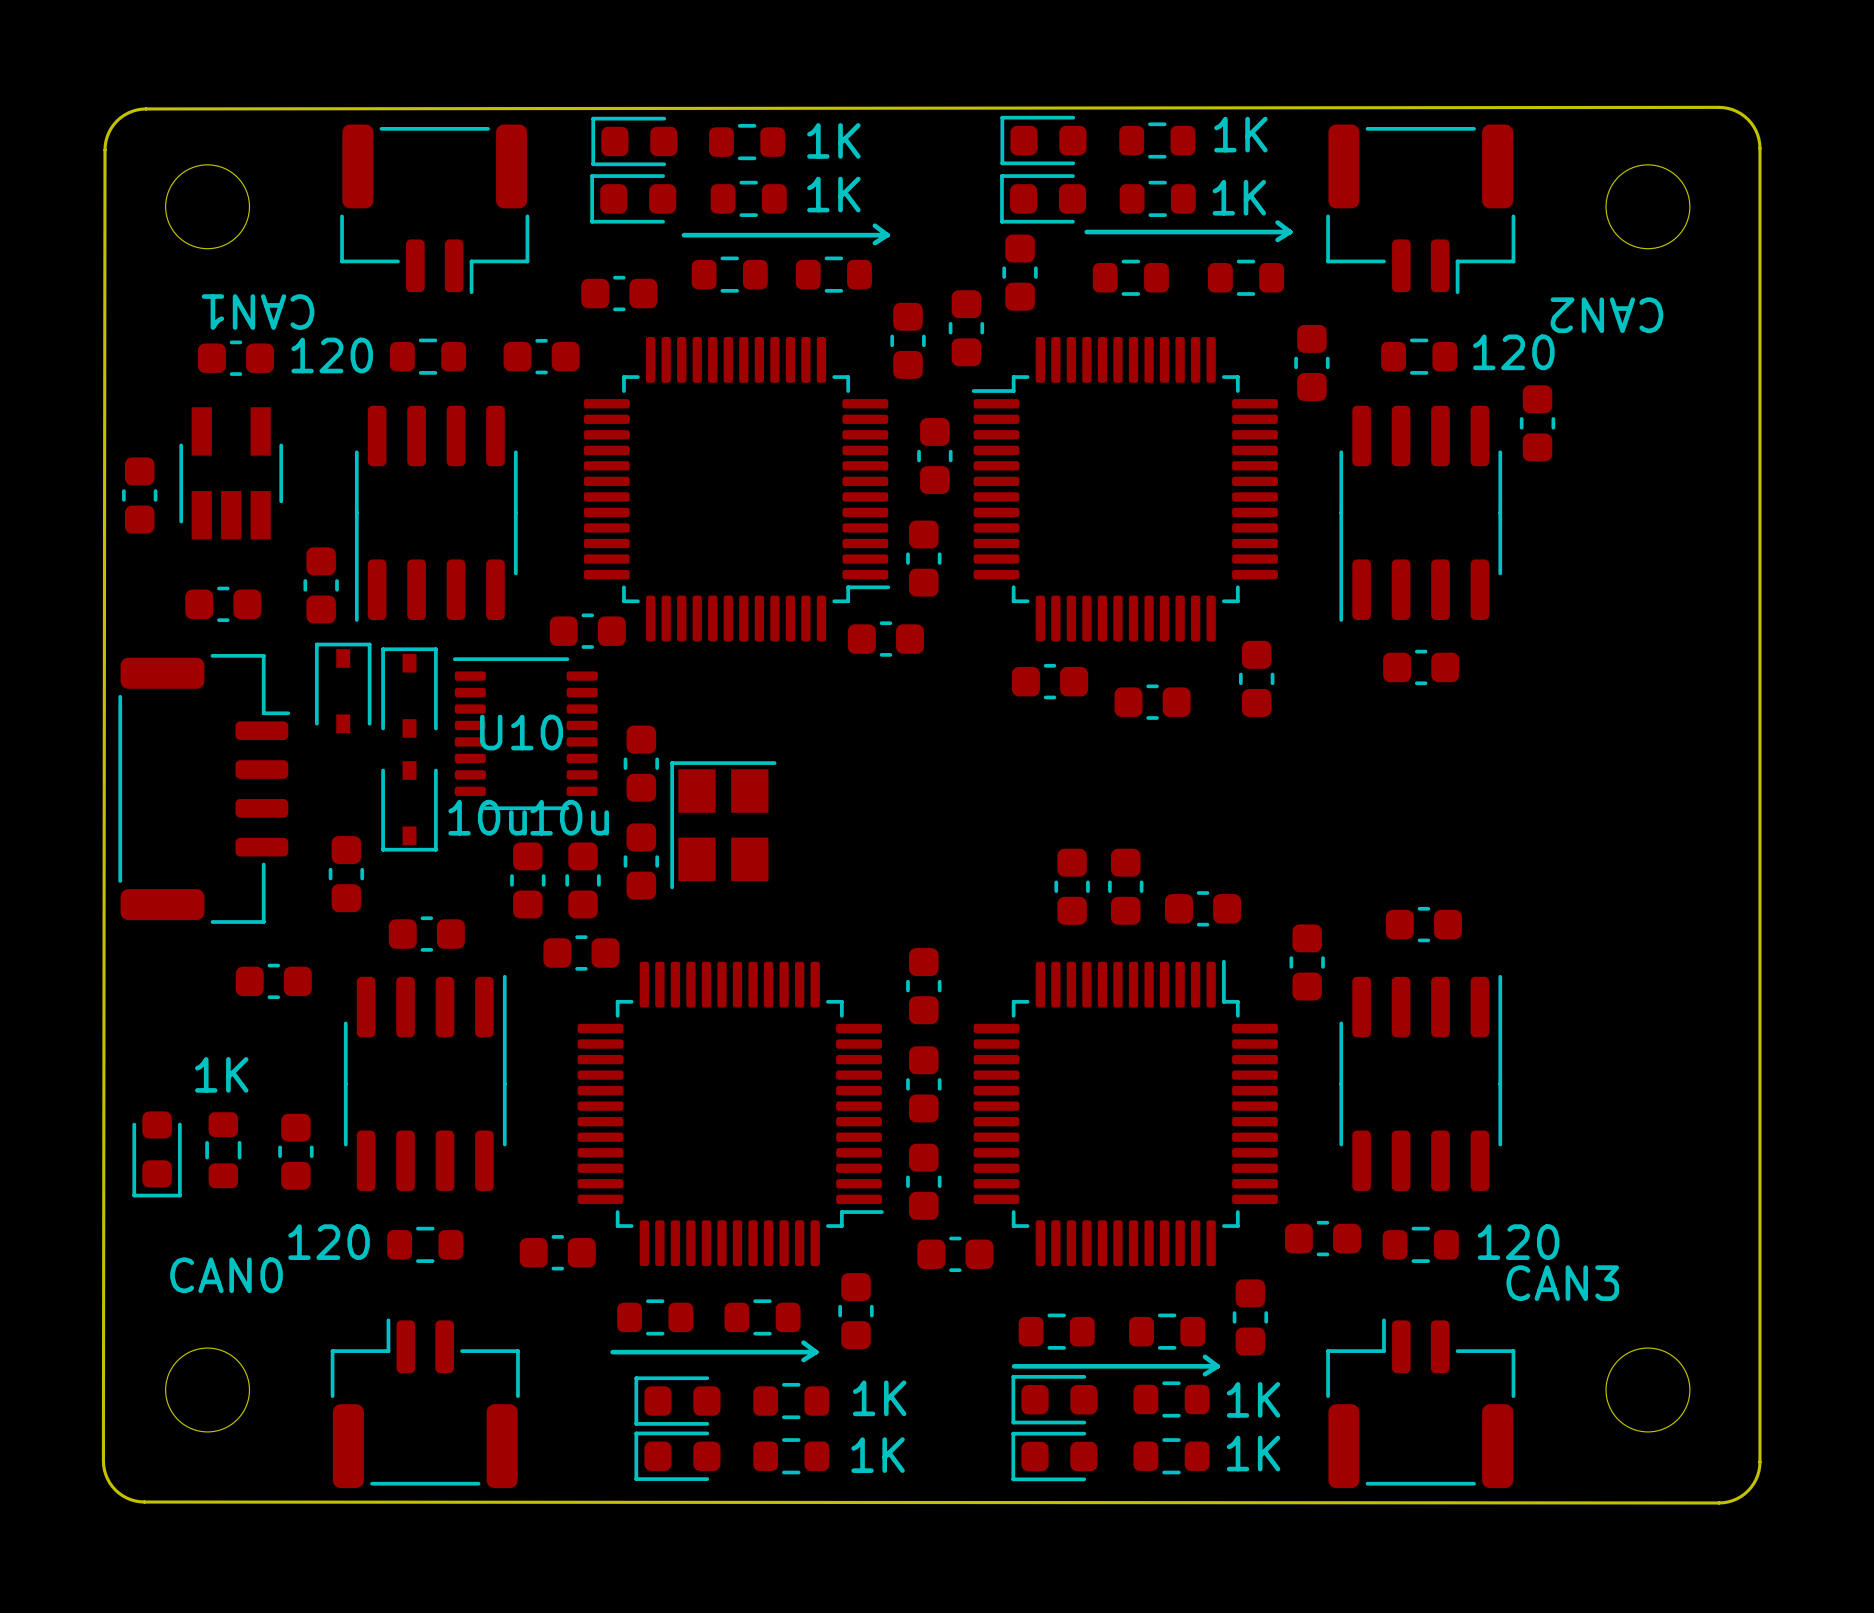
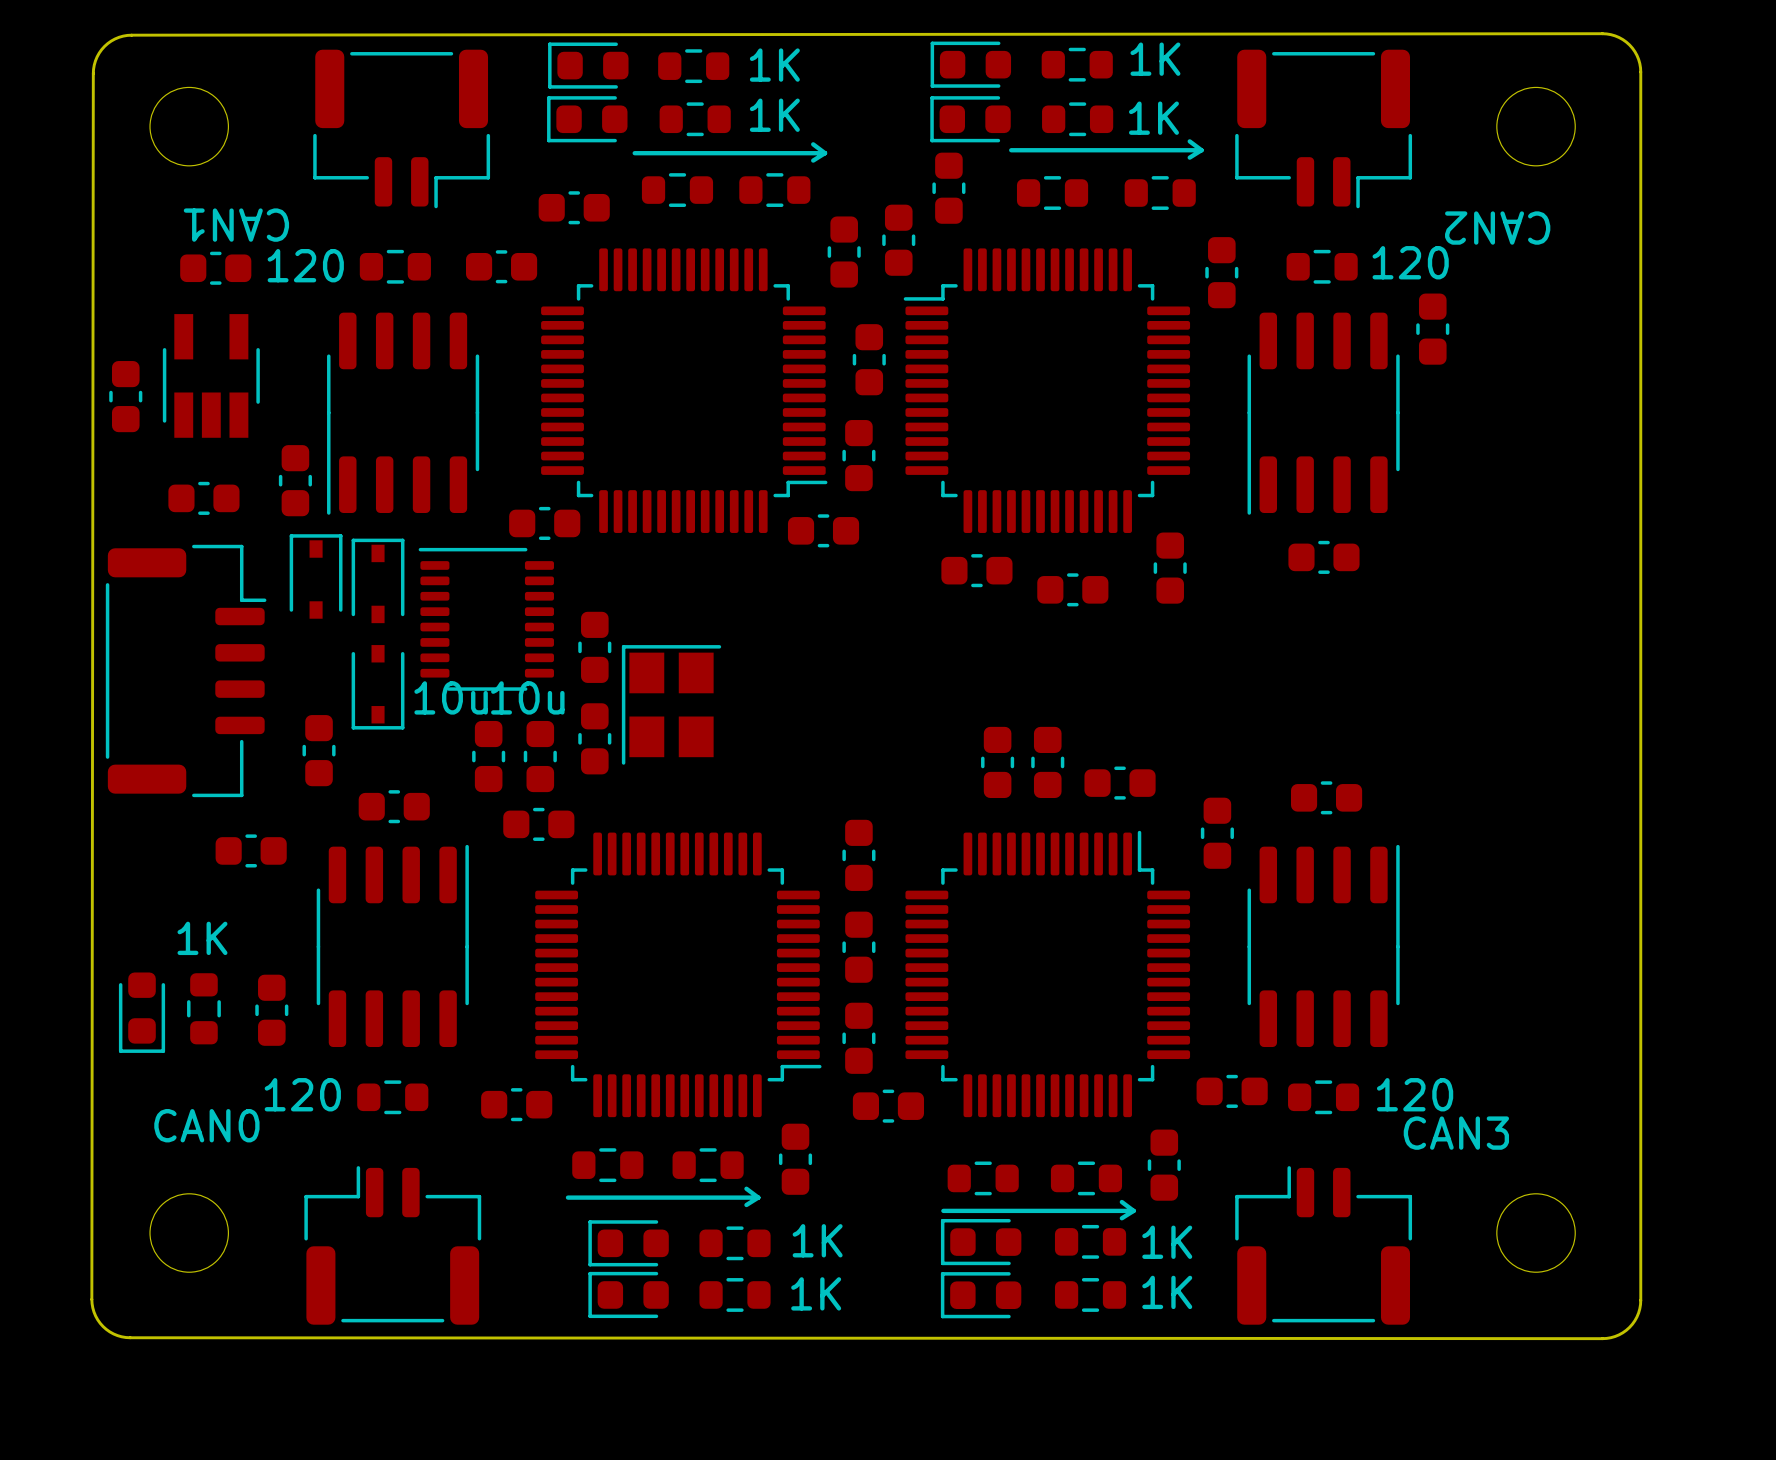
U10 name: U10 (521, 732) -> none

